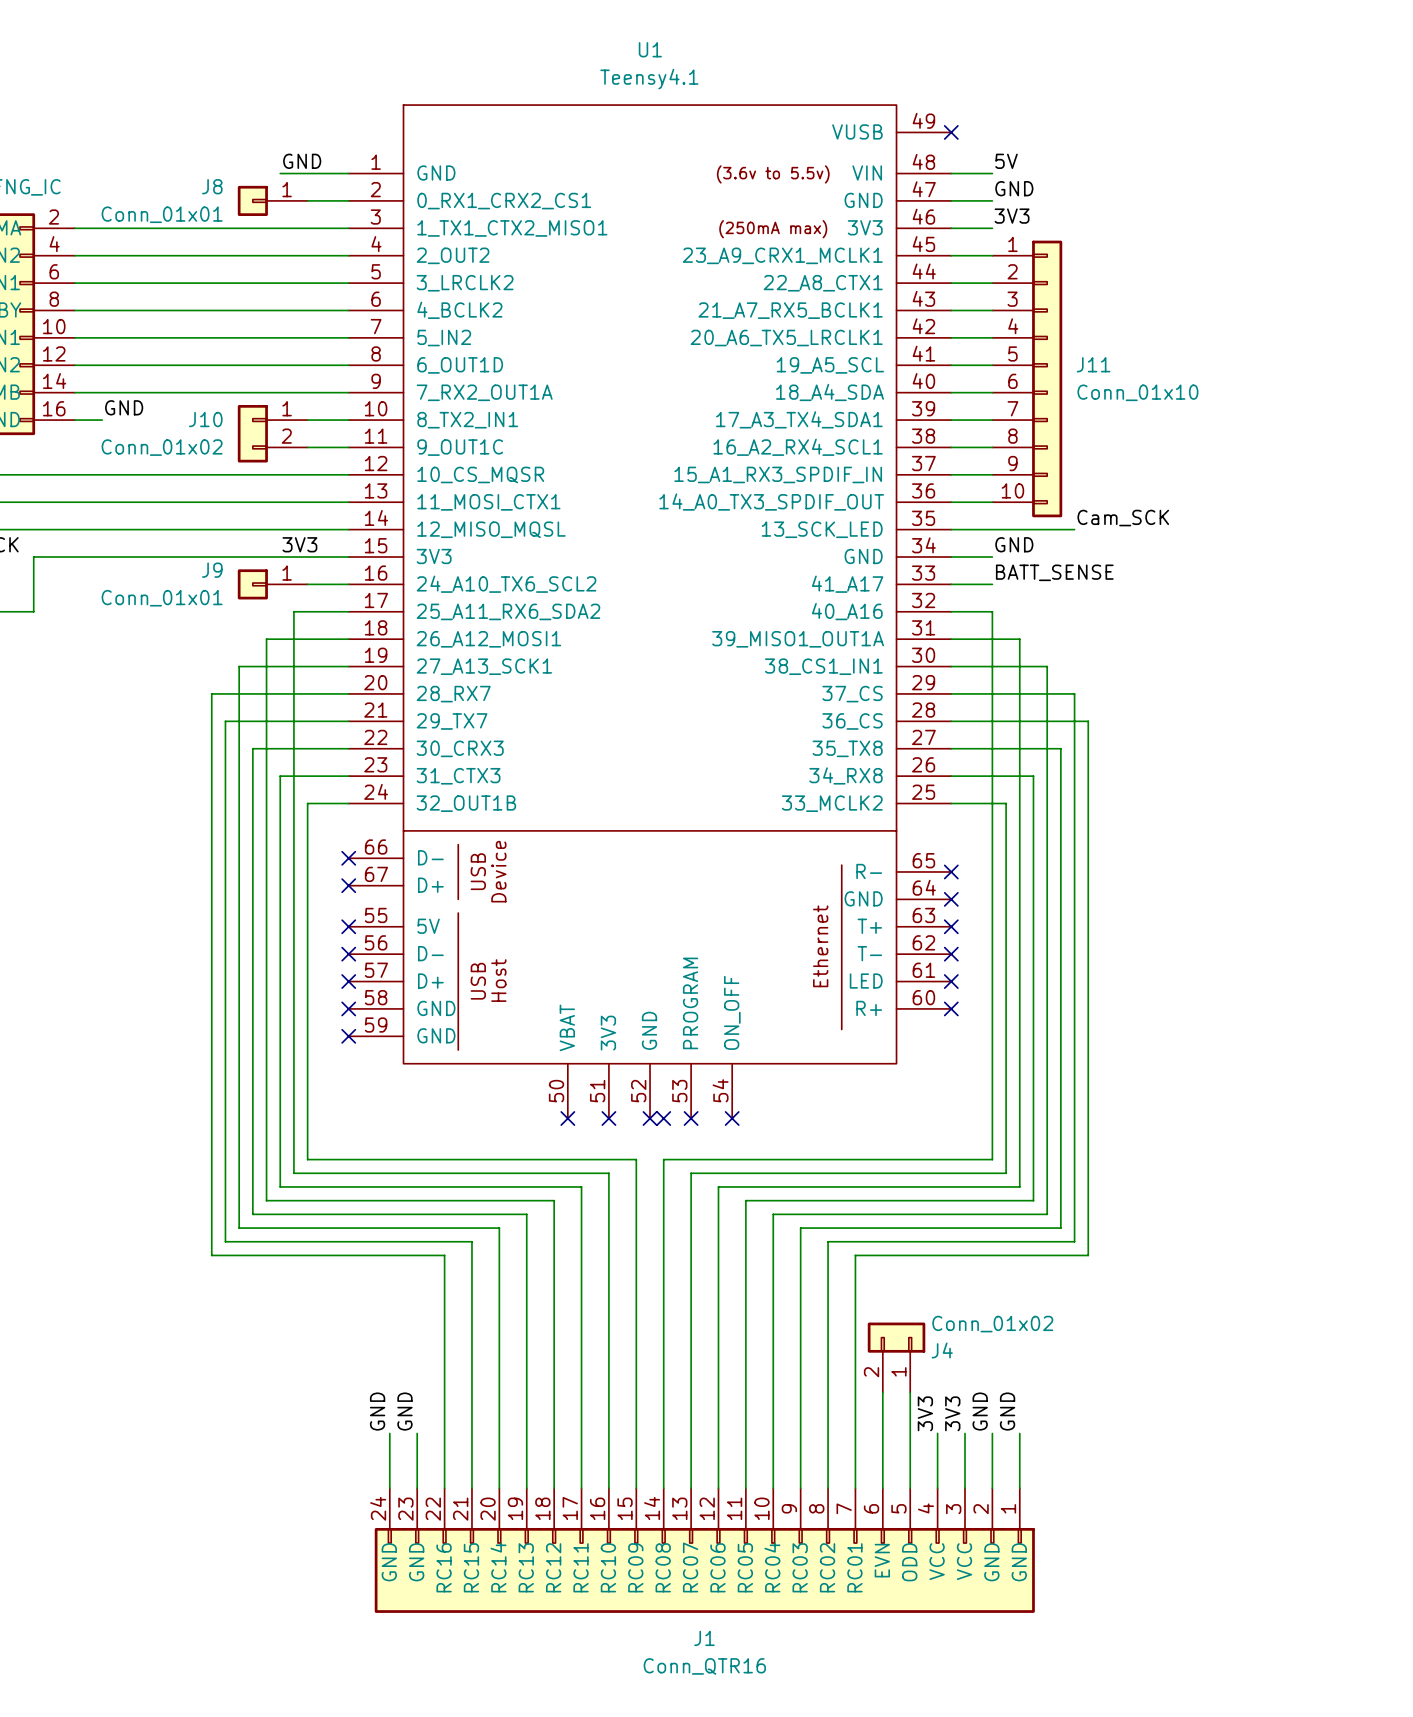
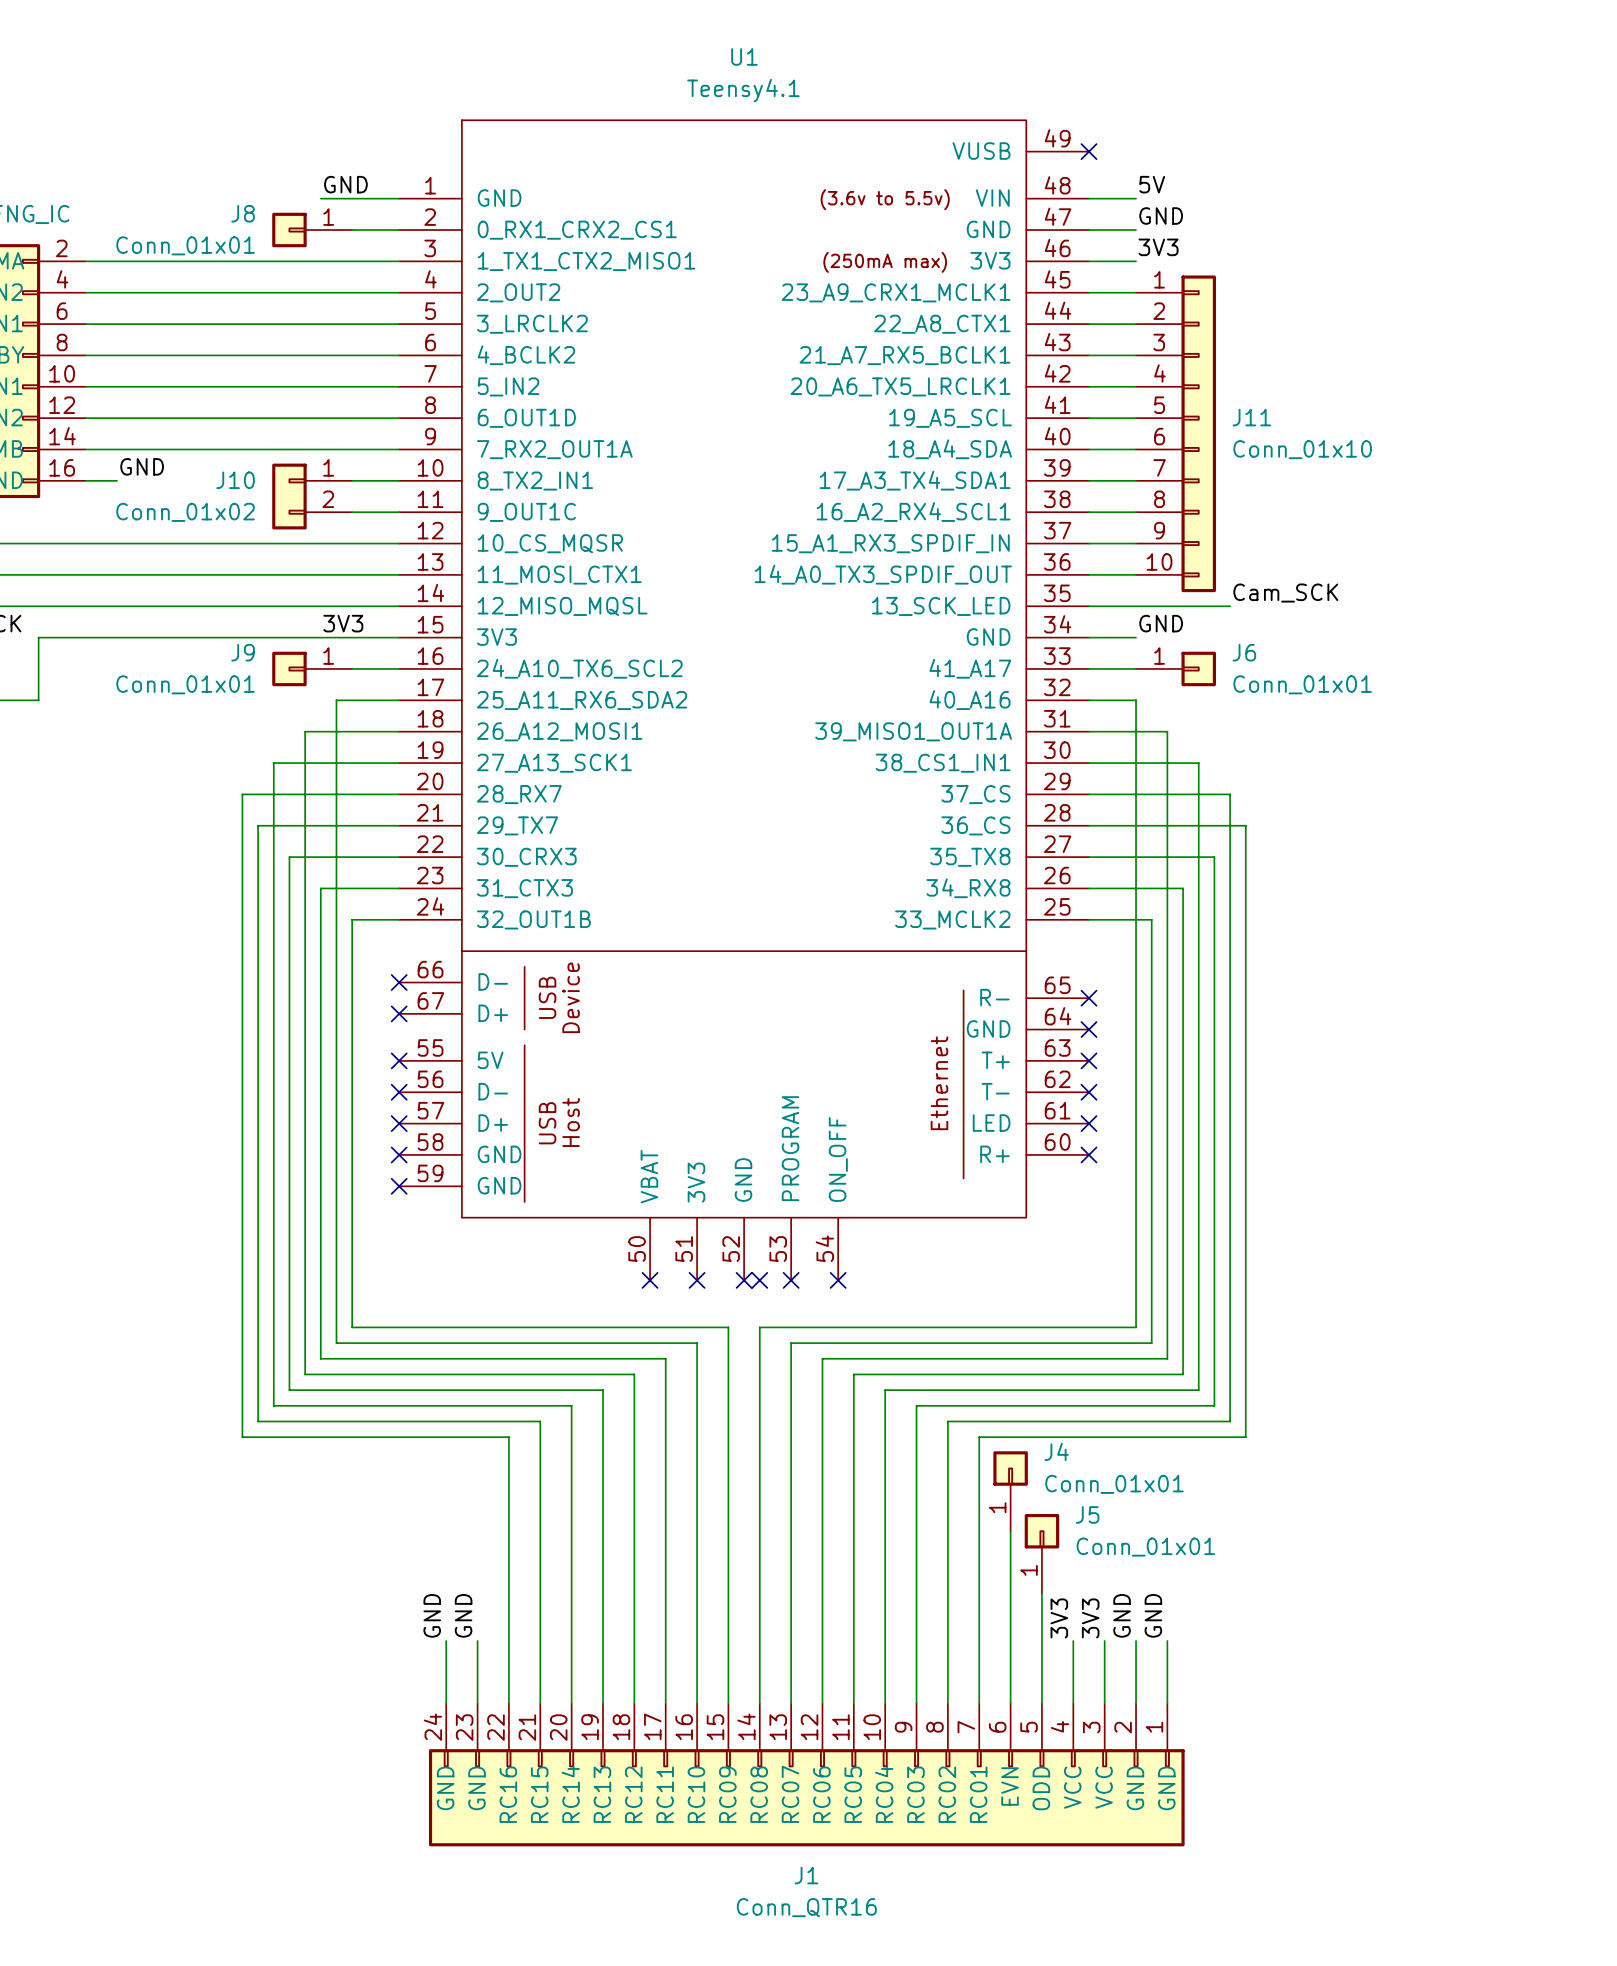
label: BATT_SENSE (1054, 572) -> none
J6: none -> Conn_01x01 (1176, 668)
J4 symbol: [867, 1322, 926, 1393] -> [993, 1451, 1028, 1532]
J4 value: Conn_01x02 (992, 1324) -> Conn_01x01 (1114, 1484)
J4 name position: J4 (942, 1350) -> J4 (1056, 1451)
J5: none -> Conn_01x01 (1041, 1553)

